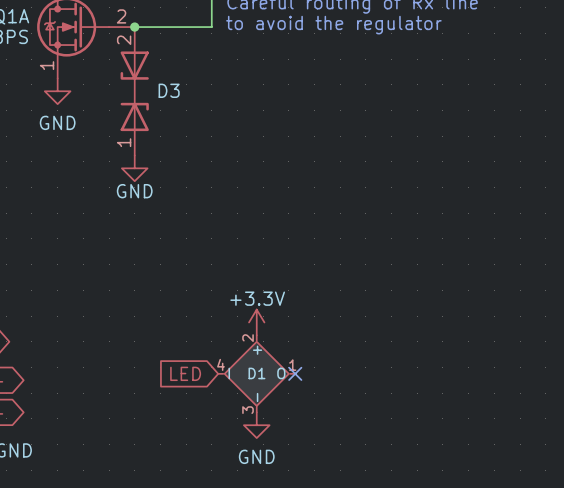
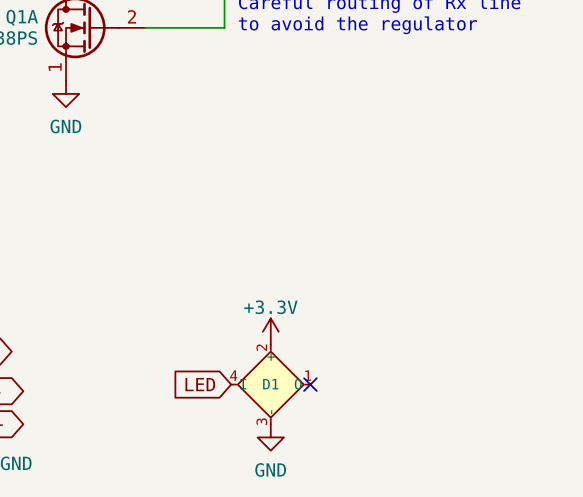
junction: (134, 27) -> none
D3: (134, 91) -> none
power symbol: GND (134, 168) -> none

